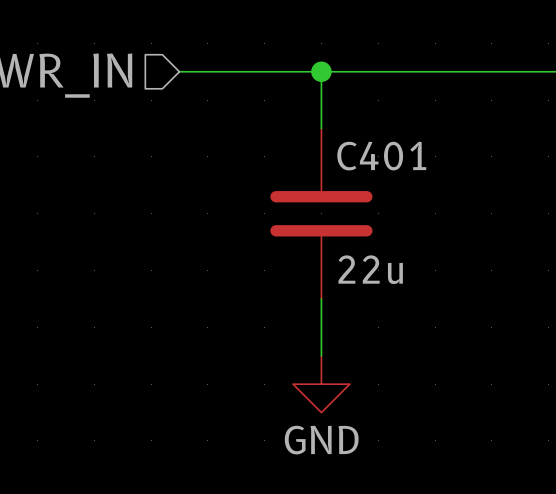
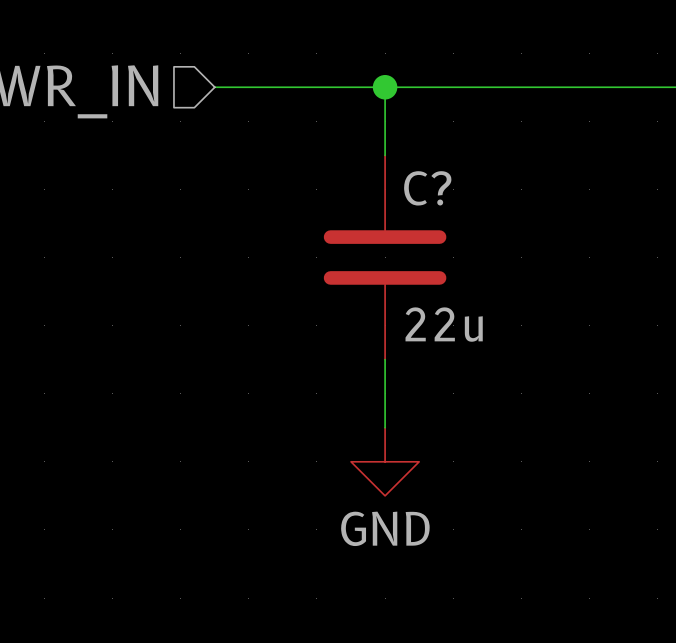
C401 name: C401 (381, 156) -> C? (427, 188)

